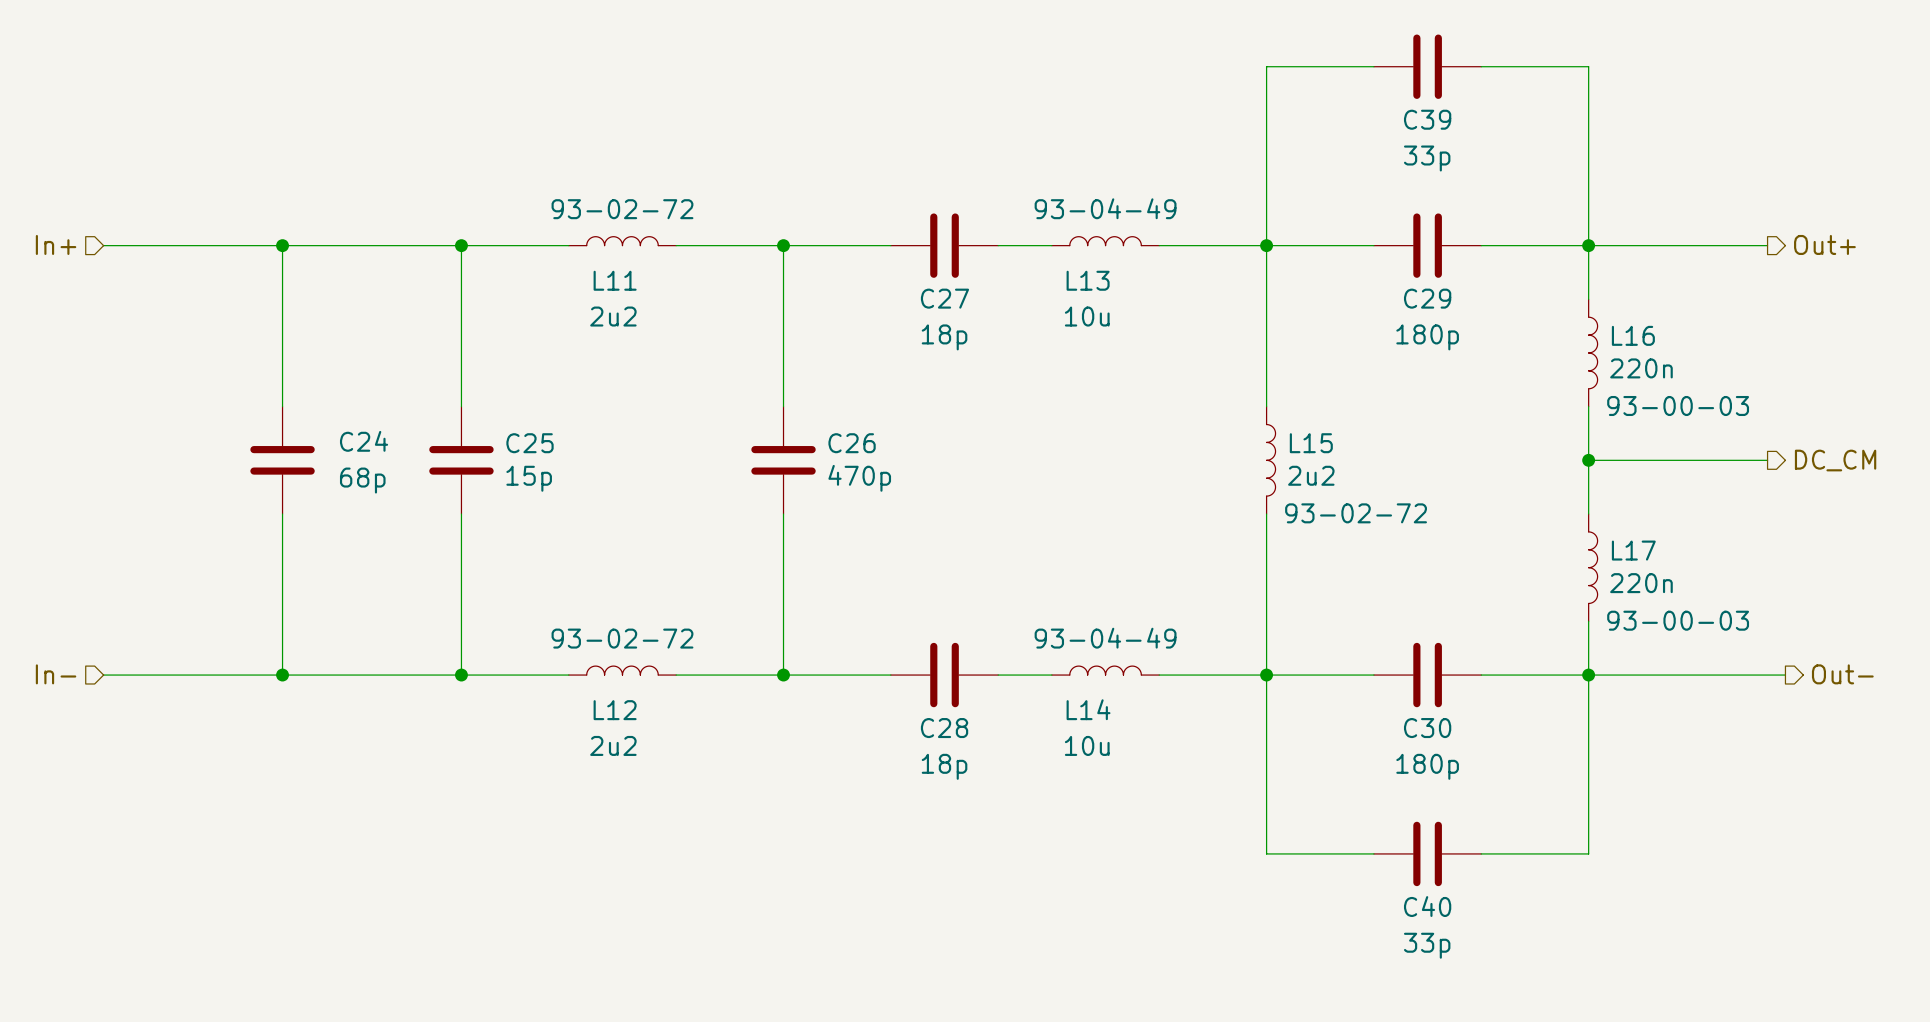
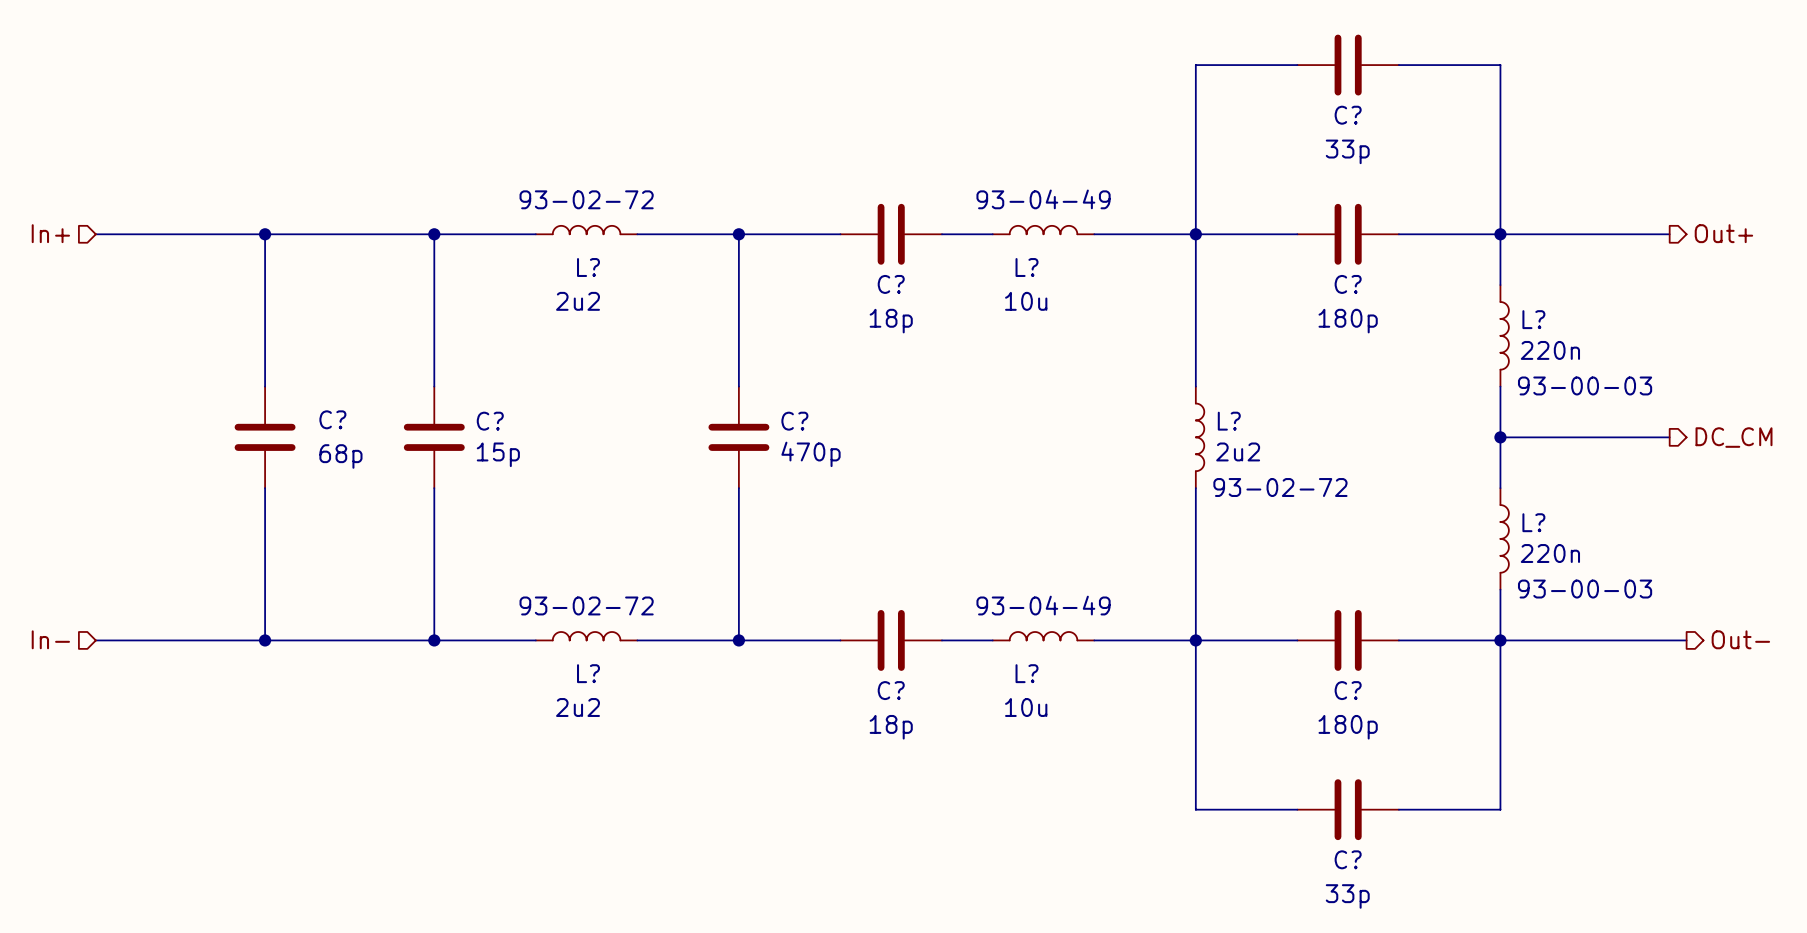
C39 name: C39 (1427, 119) -> C? (1348, 115)
L11 name: L11 (615, 280) -> L? (588, 267)
L13 name: L13 (1088, 280) -> L? (1027, 267)
C27 name: C27 (944, 298) -> C? (891, 284)
C29 name: C29 (1427, 298) -> C? (1348, 284)
L16 name: L16 (1633, 335) -> L? (1533, 319)
C24 name: C24 (364, 441) -> C? (332, 419)
C25 name: C25 (530, 443) -> C? (490, 421)
C26 name: C26 (852, 443) -> C? (794, 421)
L15 name: L15 (1311, 443) -> L? (1229, 421)
L17 name: L17 (1633, 550) -> L? (1533, 522)
L14 name: L14 (1088, 709) -> L? (1027, 673)
L12 name: L12 (615, 710) -> L? (588, 673)
C28 name: C28 (944, 728) -> C? (891, 690)
C30 name: C30 (1427, 728) -> C? (1348, 690)
C40 name: C40 (1427, 906) -> C? (1348, 859)

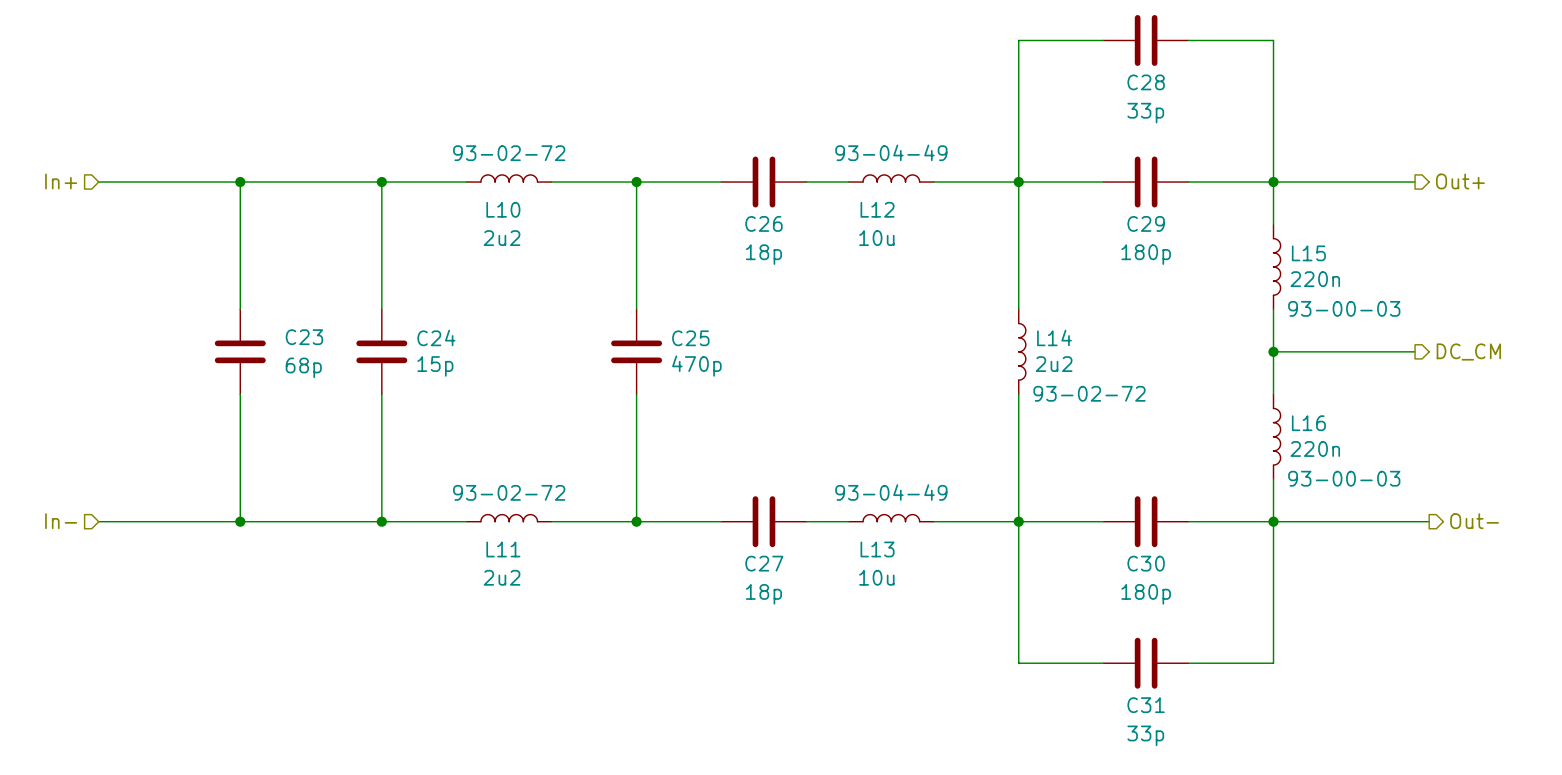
C? name: C? (1348, 115) -> C28 (1146, 82)
L? name: L? (588, 267) -> L10 (503, 209)
L? name: L? (1027, 267) -> L12 (877, 209)
C? name: C? (891, 284) -> C26 (763, 223)
C? name: C? (1348, 284) -> C29 (1146, 223)
L? name: L? (1533, 319) -> L15 (1308, 253)
C? name: C? (332, 419) -> C23 (304, 337)
C? name: C? (490, 421) -> C24 (436, 337)
C? name: C? (794, 421) -> C25 (690, 338)
L? name: L? (1229, 421) -> L14 (1054, 337)
L? name: L? (1533, 522) -> L16 (1308, 423)
L? name: L? (588, 673) -> L11 (503, 549)
L? name: L? (1027, 673) -> L13 (877, 549)
C? name: C? (891, 690) -> C27 (764, 563)
C? name: C? (1348, 690) -> C30 (1146, 563)
C? name: C? (1348, 859) -> C31 (1146, 705)

